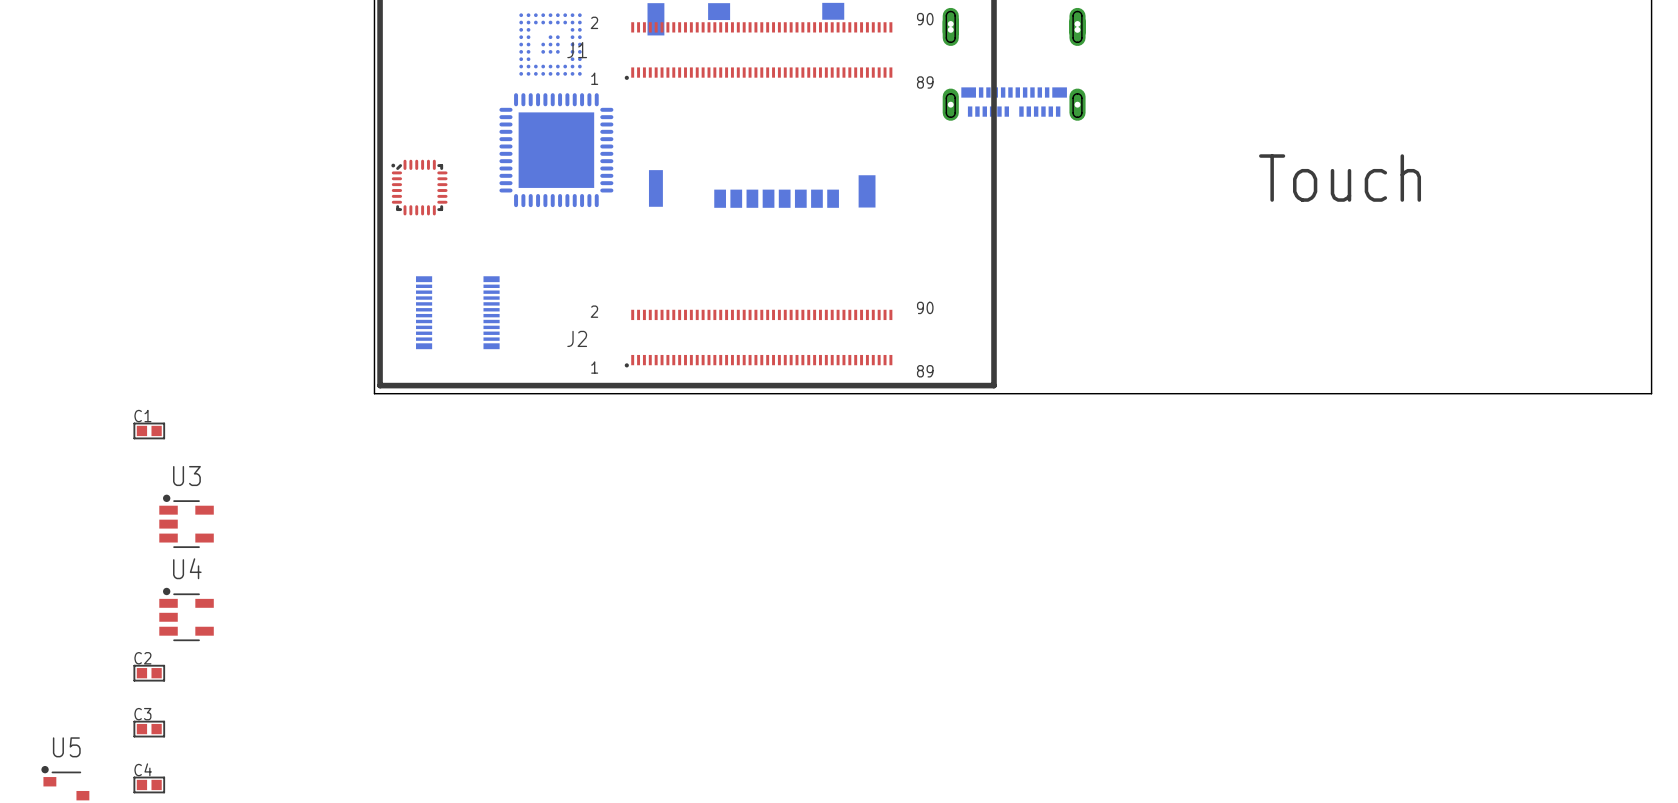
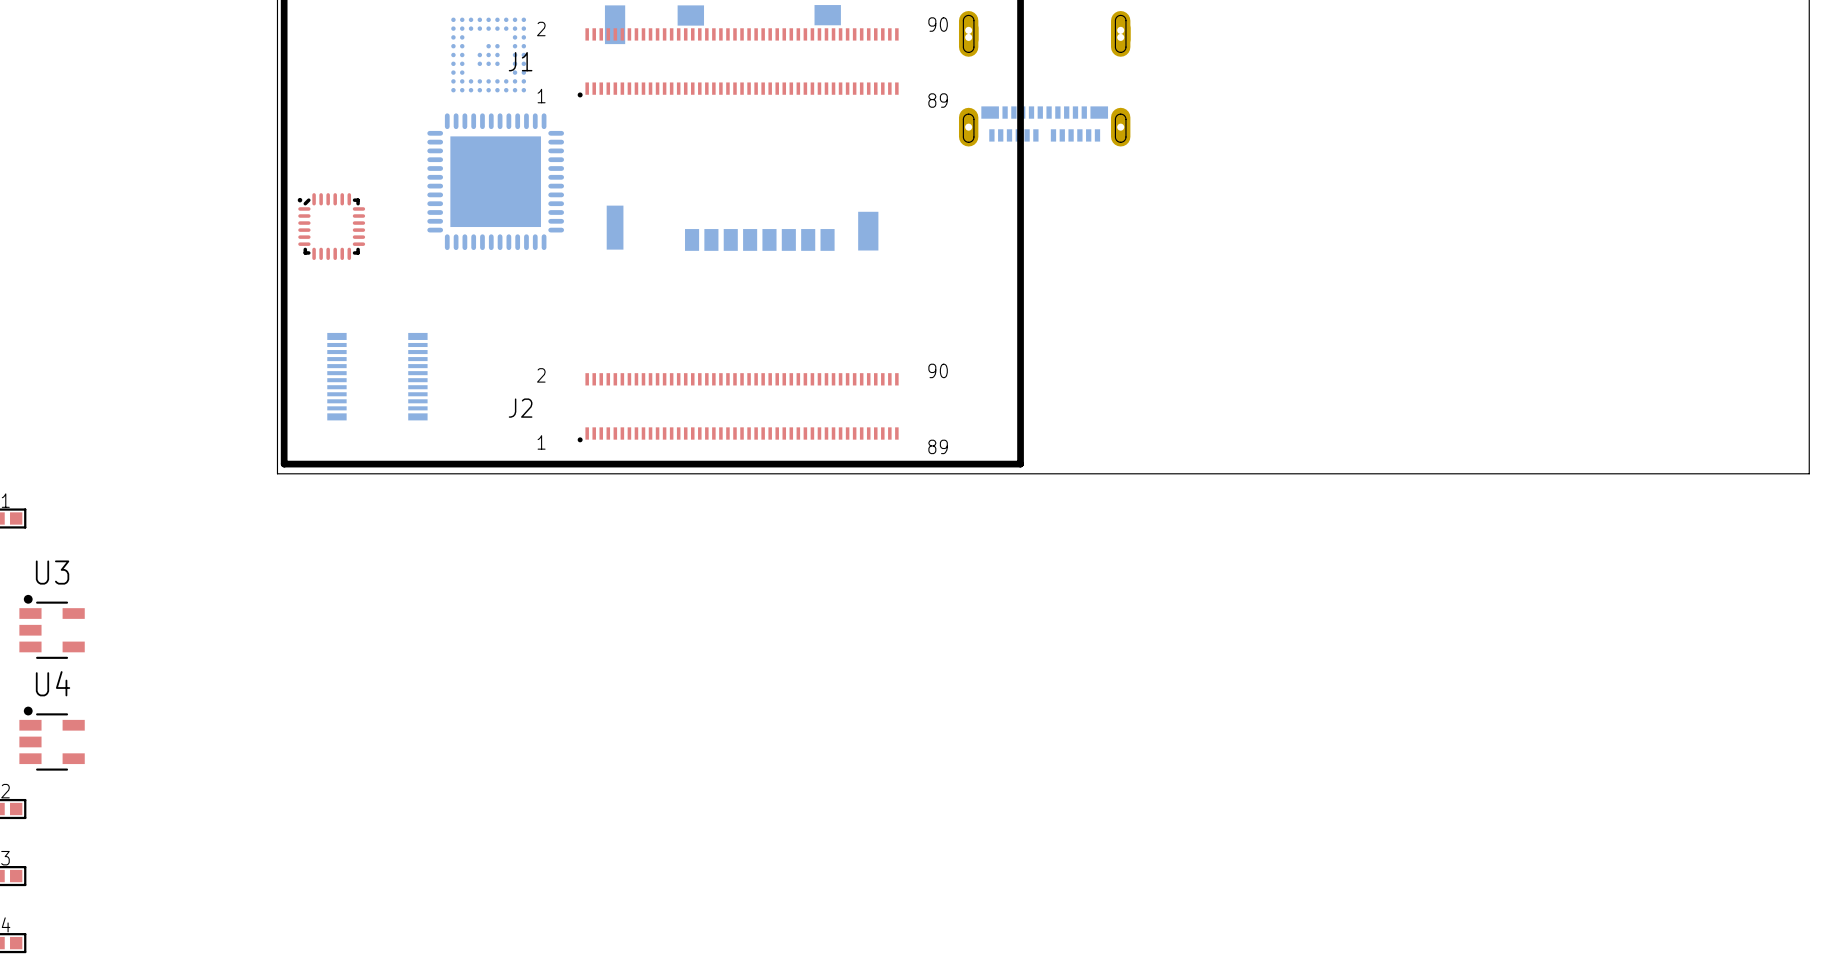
text: Touch (1340, 178) -> none

